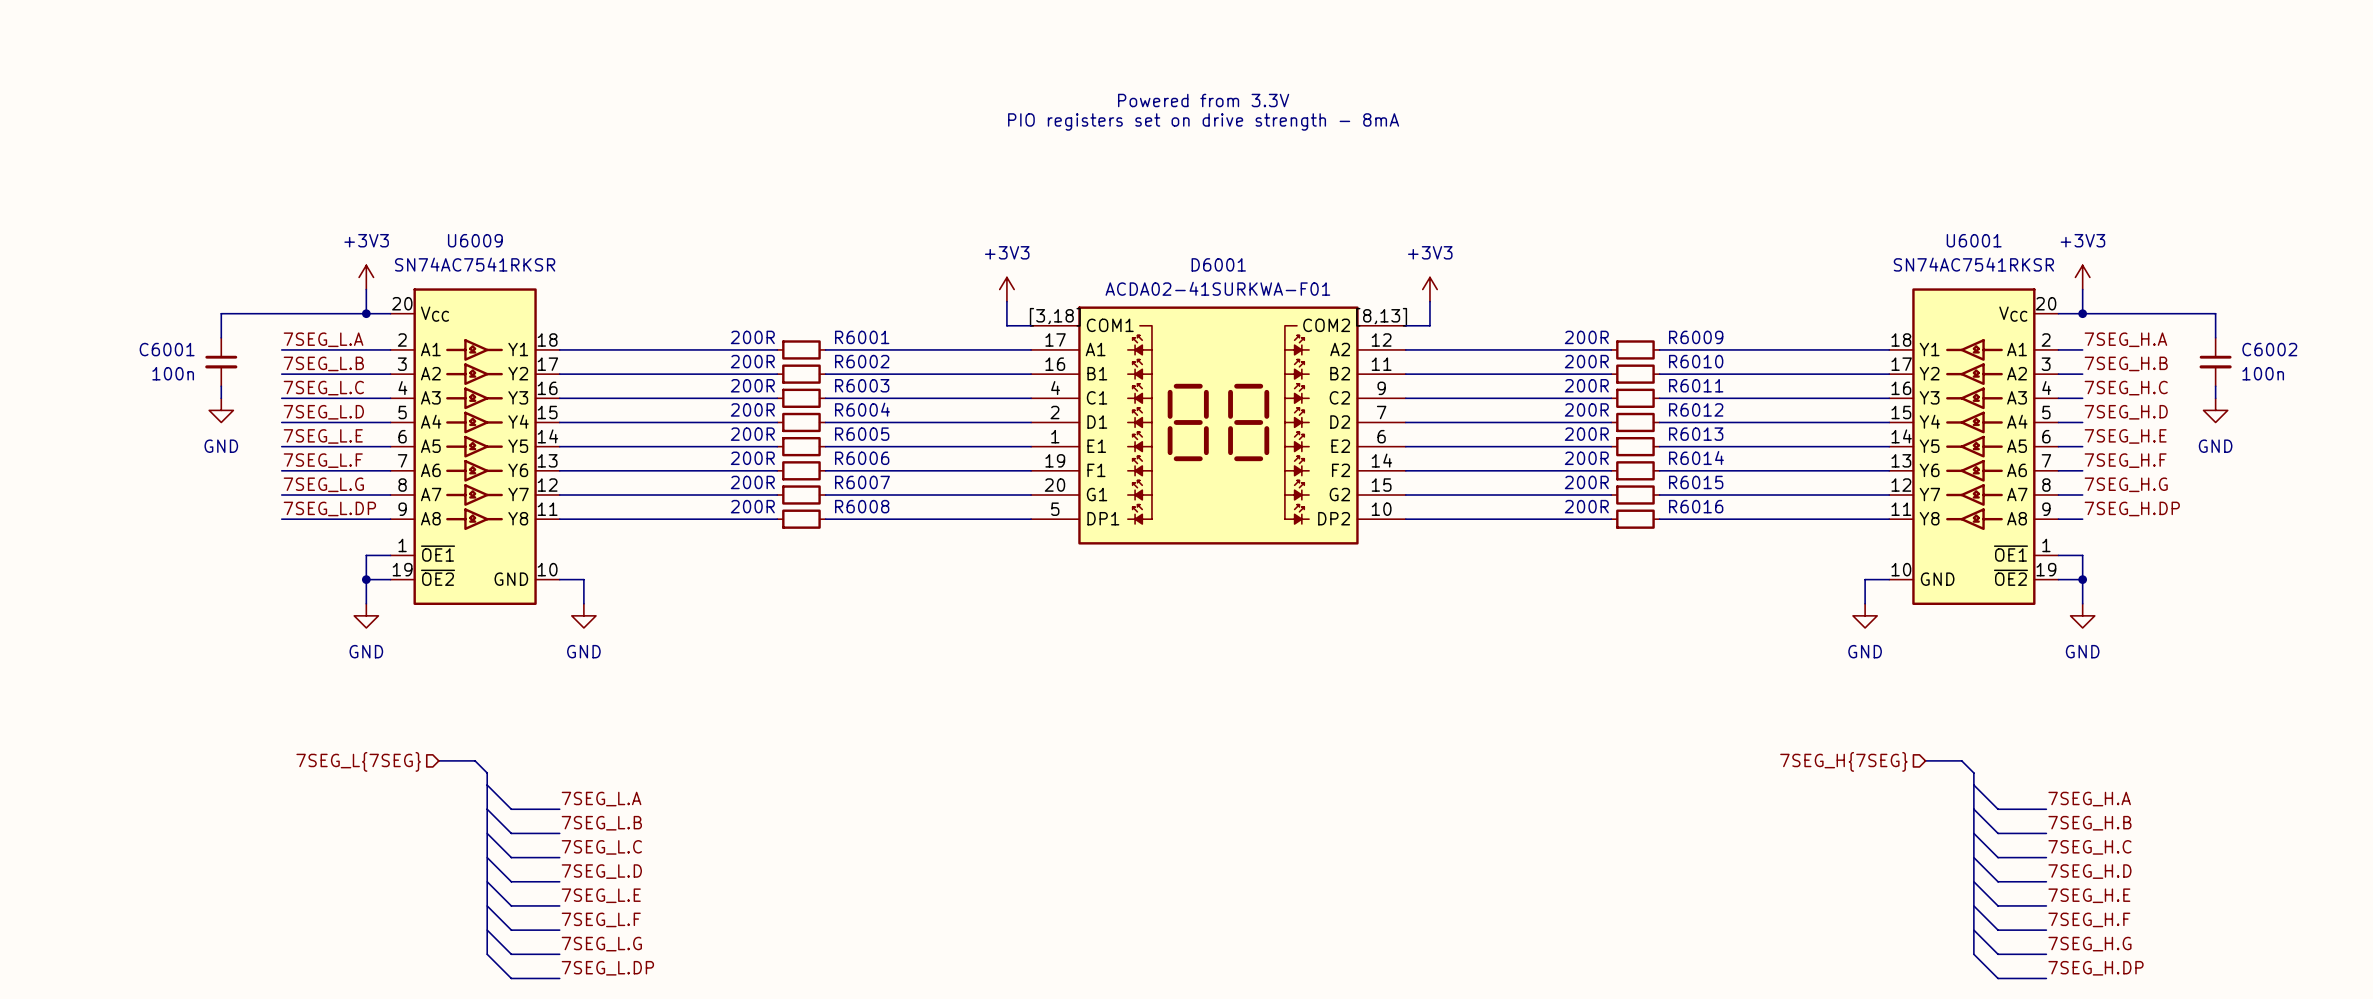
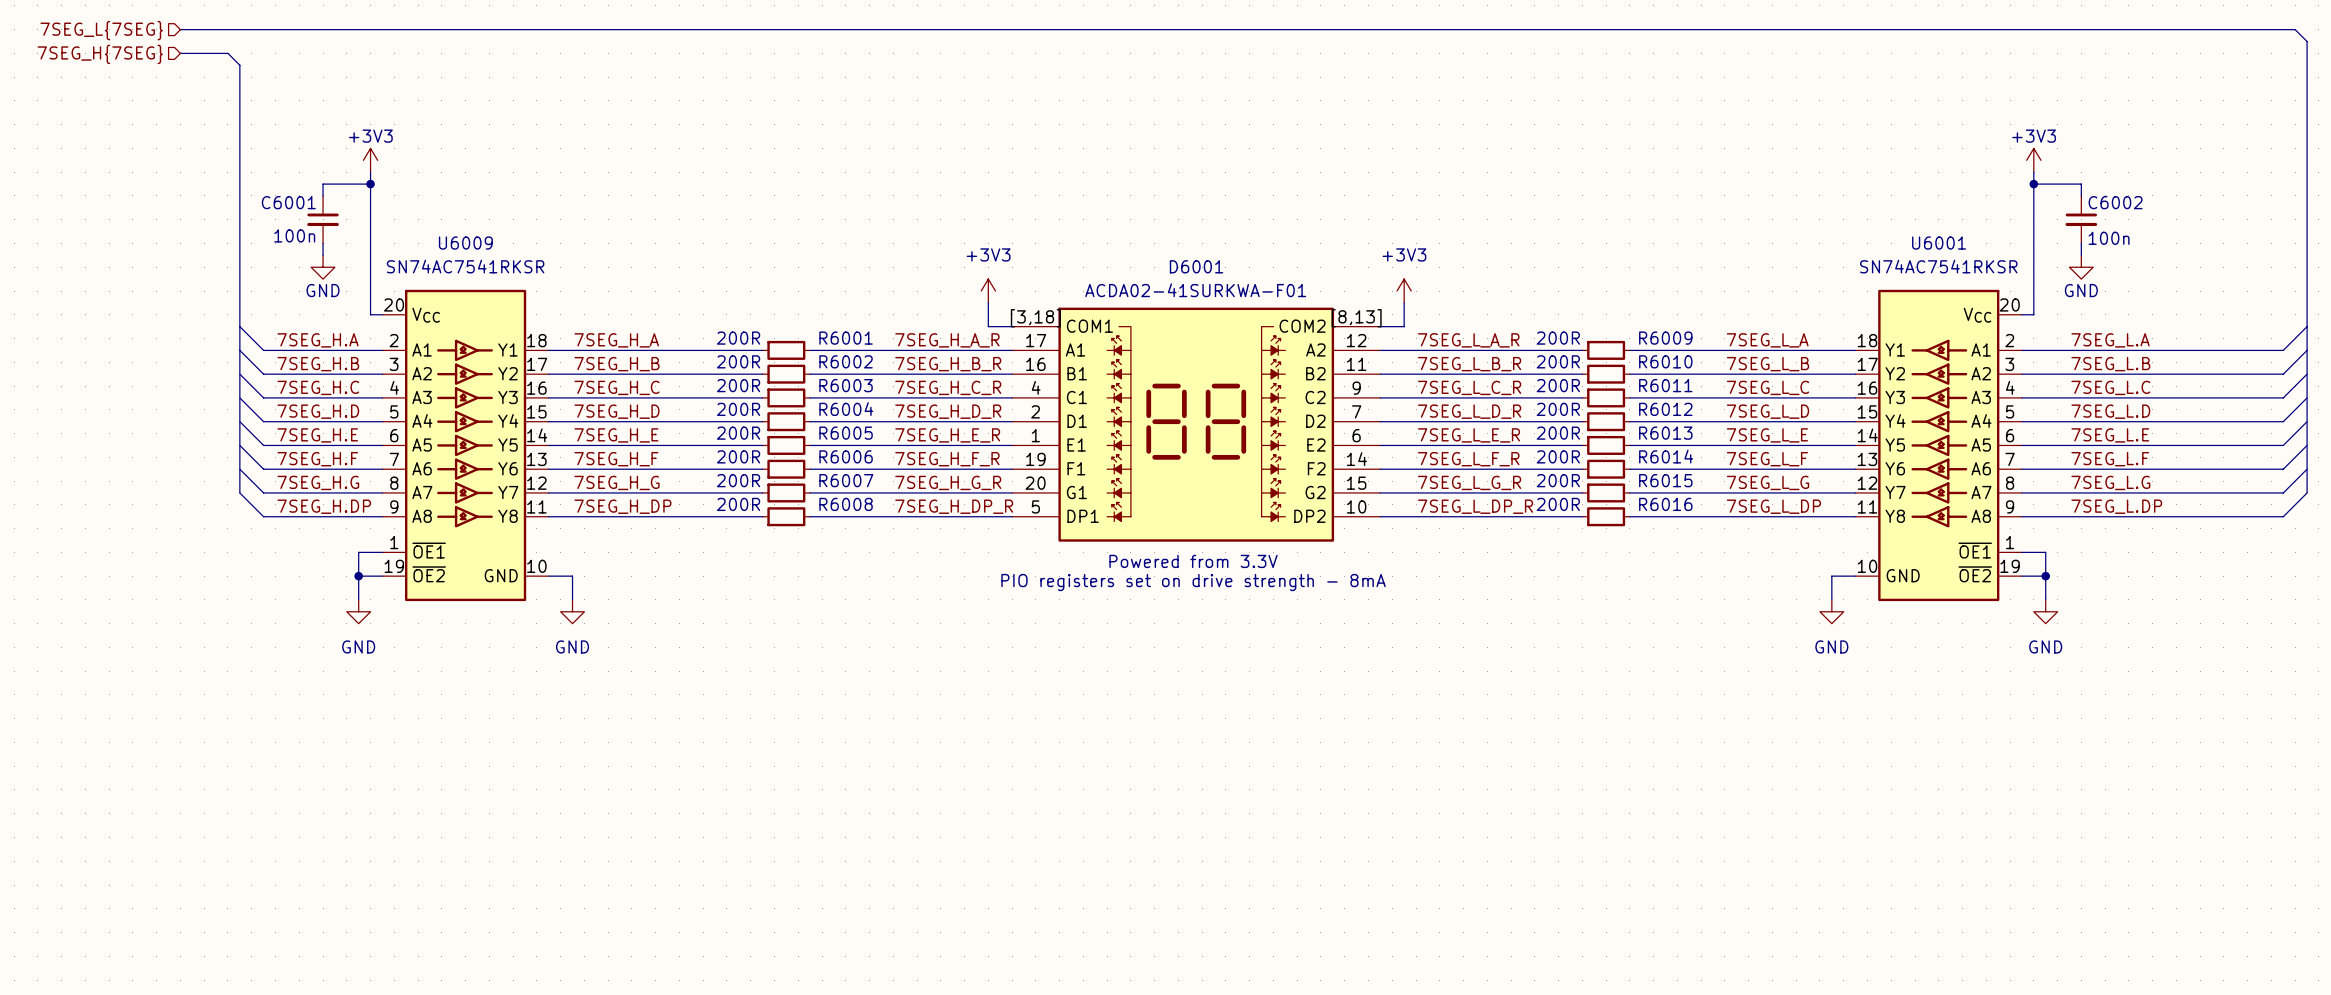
bus: none -> (180, 29) (2295, 29) (2307, 41) (2307, 492)
hierarchical label: none -> 7SEG_L{7SEG} (101, 30)
bus: none -> (180, 53) (227, 53) (239, 65) (239, 492)
hierarchical label: none -> 7SEG_H{7SEG} (100, 54)
text: Powered from 3.3V (1203, 100) -> none
text: PIO registers set on drive strength - 8mA (1203, 121) -> none
wire: none -> (370, 184) (323, 184) (323, 195)
junction: none -> (370, 184)
wire: none -> (2033, 184) (2081, 184) (2081, 195)
junction: none -> (2033, 184)
power symbol text position: +3V3 (366, 240) -> +3V3 (370, 136)
power symbol text position: +3V3 (2082, 240) -> +3V3 (2034, 136)
power symbol position: +3V3 (366, 277) -> +3V3 (370, 160)
power symbol position: +3V3 (2082, 277) -> +3V3 (2033, 160)
wire: (366, 289) (366, 313) -> none
wire: (2082, 289) (2082, 313) -> none
junction: (366, 313) -> none
wire: (378, 313) (221, 313) (221, 337) -> (370, 314) (370, 172)
wire: (2070, 313) (2215, 313) (2215, 337) -> (2033, 314) (2033, 172)
junction: (2082, 313) -> none
wire: none -> (239, 326) (263, 350) (275, 350)
wire: none -> (2307, 326) (2283, 350) (2045, 350)
label: 7SEG_L.A (323, 339) -> 7SEG_H.A (318, 340)
label: none -> 7SEG_H_A (616, 340)
label: none -> 7SEG_H_A_R (947, 340)
label: none -> 7SEG_L_A_R (1468, 340)
label: none -> 7SEG_L_A (1767, 340)
label: 7SEG_H.A (2125, 339) -> none
label: none -> 7SEG_L.A (2110, 340)
C6001 name position: C6001 (167, 349) -> C6001 (288, 202)
wire: none -> (239, 350) (263, 374) (275, 374)
C6002 name position: C6002 (2269, 349) -> C6002 (2115, 202)
wire: none -> (2307, 350) (2283, 374) (2045, 374)
C6001 position: (221, 362) -> (323, 219)
C6002 position: (2215, 362) -> (2081, 219)
label: 7SEG_L.B (323, 363) -> 7SEG_H.B (318, 364)
label: none -> 7SEG_H_B (617, 364)
label: none -> 7SEG_H_B_R (948, 364)
label: none -> 7SEG_L_B_R (1469, 364)
label: none -> 7SEG_L_B (1768, 364)
label: 7SEG_H.B (2126, 363) -> none
label: none -> 7SEG_L.B (2110, 364)
C6001 text position: 100n (173, 373) -> 100n (294, 235)
C6002 text position: 100n (2263, 373) -> 100n (2109, 238)
wire: none -> (239, 374) (263, 397) (275, 397)
wire: none -> (2307, 374) (2283, 397) (2045, 397)
wire: (221, 386) (221, 398) -> (323, 243) (323, 255)
wire: (2215, 386) (2215, 398) -> (2081, 243) (2081, 255)
label: 7SEG_L.C (323, 388) -> 7SEG_H.C (318, 387)
label: none -> 7SEG_H_C (617, 387)
label: none -> 7SEG_H_C_R (948, 387)
label: none -> 7SEG_L_C_R (1469, 387)
label: none -> 7SEG_L_C (1768, 387)
label: 7SEG_H.C (2126, 388) -> none
label: none -> 7SEG_L.C (2110, 387)
wire: none -> (239, 397) (263, 421) (275, 421)
wire: none -> (2307, 397) (2283, 421) (2045, 421)
power symbol position: GND (221, 410) -> GND (323, 267)
power symbol position: GND (2215, 410) -> GND (2081, 267)
label: 7SEG_L.D (323, 412) -> 7SEG_H.D (318, 411)
label: none -> 7SEG_H_D (617, 411)
label: none -> 7SEG_H_D_R (948, 411)
label: none -> 7SEG_L_D_R (1469, 411)
label: none -> 7SEG_L_D (1768, 411)
label: 7SEG_H.D (2126, 412) -> none
label: none -> 7SEG_L.D (2110, 411)
wire: none -> (239, 421) (263, 445) (275, 445)
wire: none -> (2307, 421) (2283, 445) (2045, 445)
label: 7SEG_L.E (323, 436) -> 7SEG_H.E (317, 435)
label: none -> 7SEG_H_E (616, 435)
label: none -> 7SEG_H_E_R (947, 435)
label: none -> 7SEG_L_E_R (1469, 435)
label: none -> 7SEG_L_E (1767, 435)
label: 7SEG_H.E (2125, 436) -> none
label: none -> 7SEG_L.E (2110, 435)
power symbol text position: GND (221, 446) -> GND (323, 290)
wire: none -> (239, 445) (263, 469) (275, 469)
power symbol text position: GND (2215, 446) -> GND (2081, 290)
wire: none -> (2307, 445) (2283, 469) (2045, 469)
label: 7SEG_L.F (323, 460) -> 7SEG_H.F (317, 459)
label: none -> 7SEG_H_F (616, 459)
label: none -> 7SEG_H_F_R (947, 459)
label: none -> 7SEG_L_F_R (1468, 459)
label: none -> 7SEG_L_F (1767, 459)
label: 7SEG_H.F (2125, 460) -> none
label: none -> 7SEG_L.F (2110, 459)
wire: none -> (239, 469) (263, 492) (275, 492)
wire: none -> (2307, 469) (2283, 492) (2045, 492)
label: 7SEG_L.G (323, 484) -> 7SEG_H.G (318, 482)
label: none -> 7SEG_H_G (617, 482)
label: none -> 7SEG_H_G_R (948, 482)
label: none -> 7SEG_L_G_R (1469, 482)
label: none -> 7SEG_L_G (1768, 482)
label: 7SEG_H.G (2126, 484) -> none
label: none -> 7SEG_L.G (2110, 482)
wire: none -> (239, 492) (263, 516) (275, 516)
wire: none -> (2307, 492) (2283, 516) (2045, 516)
label: 7SEG_L.DP (329, 508) -> 7SEG_H.DP (324, 506)
label: none -> 7SEG_H_DP (622, 506)
label: none -> 7SEG_H_DP_R (954, 506)
label: none -> 7SEG_L_DP_R (1475, 506)
label: none -> 7SEG_L_DP (1773, 506)
label: 7SEG_H.DP (2132, 508) -> none
label: none -> 7SEG_L.DP (2116, 506)
text: none -> Powered from 3.3V (1193, 561)
text: none -> PIO registers set on drive strength - 8mA (1193, 582)
bus: (438, 760) (475, 760) (487, 773) (487, 954) -> none
bus: (1925, 760) (1961, 760) (1973, 773) (1973, 954) -> none
hierarchical label: 7SEG_L{7SEG} (358, 761) -> none
hierarchical label: 7SEG_H{7SEG} (1843, 761) -> none
wire: (487, 785) (511, 809) (559, 809) -> none
wire: (1973, 785) (1998, 809) (2046, 809) -> none
label: 7SEG_L.A (601, 799) -> none
label: 7SEG_H.A (2089, 799) -> none
wire: (487, 809) (511, 833) (559, 833) -> none
wire: (1973, 809) (1998, 833) (2046, 833) -> none
label: 7SEG_L.B (601, 823) -> none
label: 7SEG_H.B (2089, 823) -> none
wire: (487, 833) (511, 857) (559, 857) -> none
wire: (1973, 833) (1998, 857) (2046, 857) -> none
label: 7SEG_L.C (601, 847) -> none
label: 7SEG_H.C (2089, 847) -> none
wire: (487, 857) (511, 881) (559, 881) -> none
wire: (1973, 857) (1998, 881) (2046, 881) -> none
label: 7SEG_L.D (601, 871) -> none
label: 7SEG_H.D (2089, 871) -> none
wire: (487, 881) (511, 905) (559, 905) -> none
wire: (1973, 881) (1998, 905) (2046, 905) -> none
label: 7SEG_L.E (601, 895) -> none
label: 7SEG_H.E (2089, 895) -> none
wire: (487, 905) (511, 930) (559, 930) -> none
wire: (1973, 905) (1998, 930) (2046, 930) -> none
label: 7SEG_L.F (601, 919) -> none
label: 7SEG_H.F (2089, 919) -> none
wire: (487, 930) (511, 954) (559, 954) -> none
wire: (1973, 930) (1998, 954) (2046, 954) -> none
label: 7SEG_L.G (601, 944) -> none
label: 7SEG_H.G (2089, 944) -> none
wire: (487, 954) (511, 978) (559, 978) -> none
wire: (1973, 954) (1998, 978) (2046, 978) -> none
label: 7SEG_L.DP (607, 968) -> none
label: 7SEG_H.DP (2095, 968) -> none

